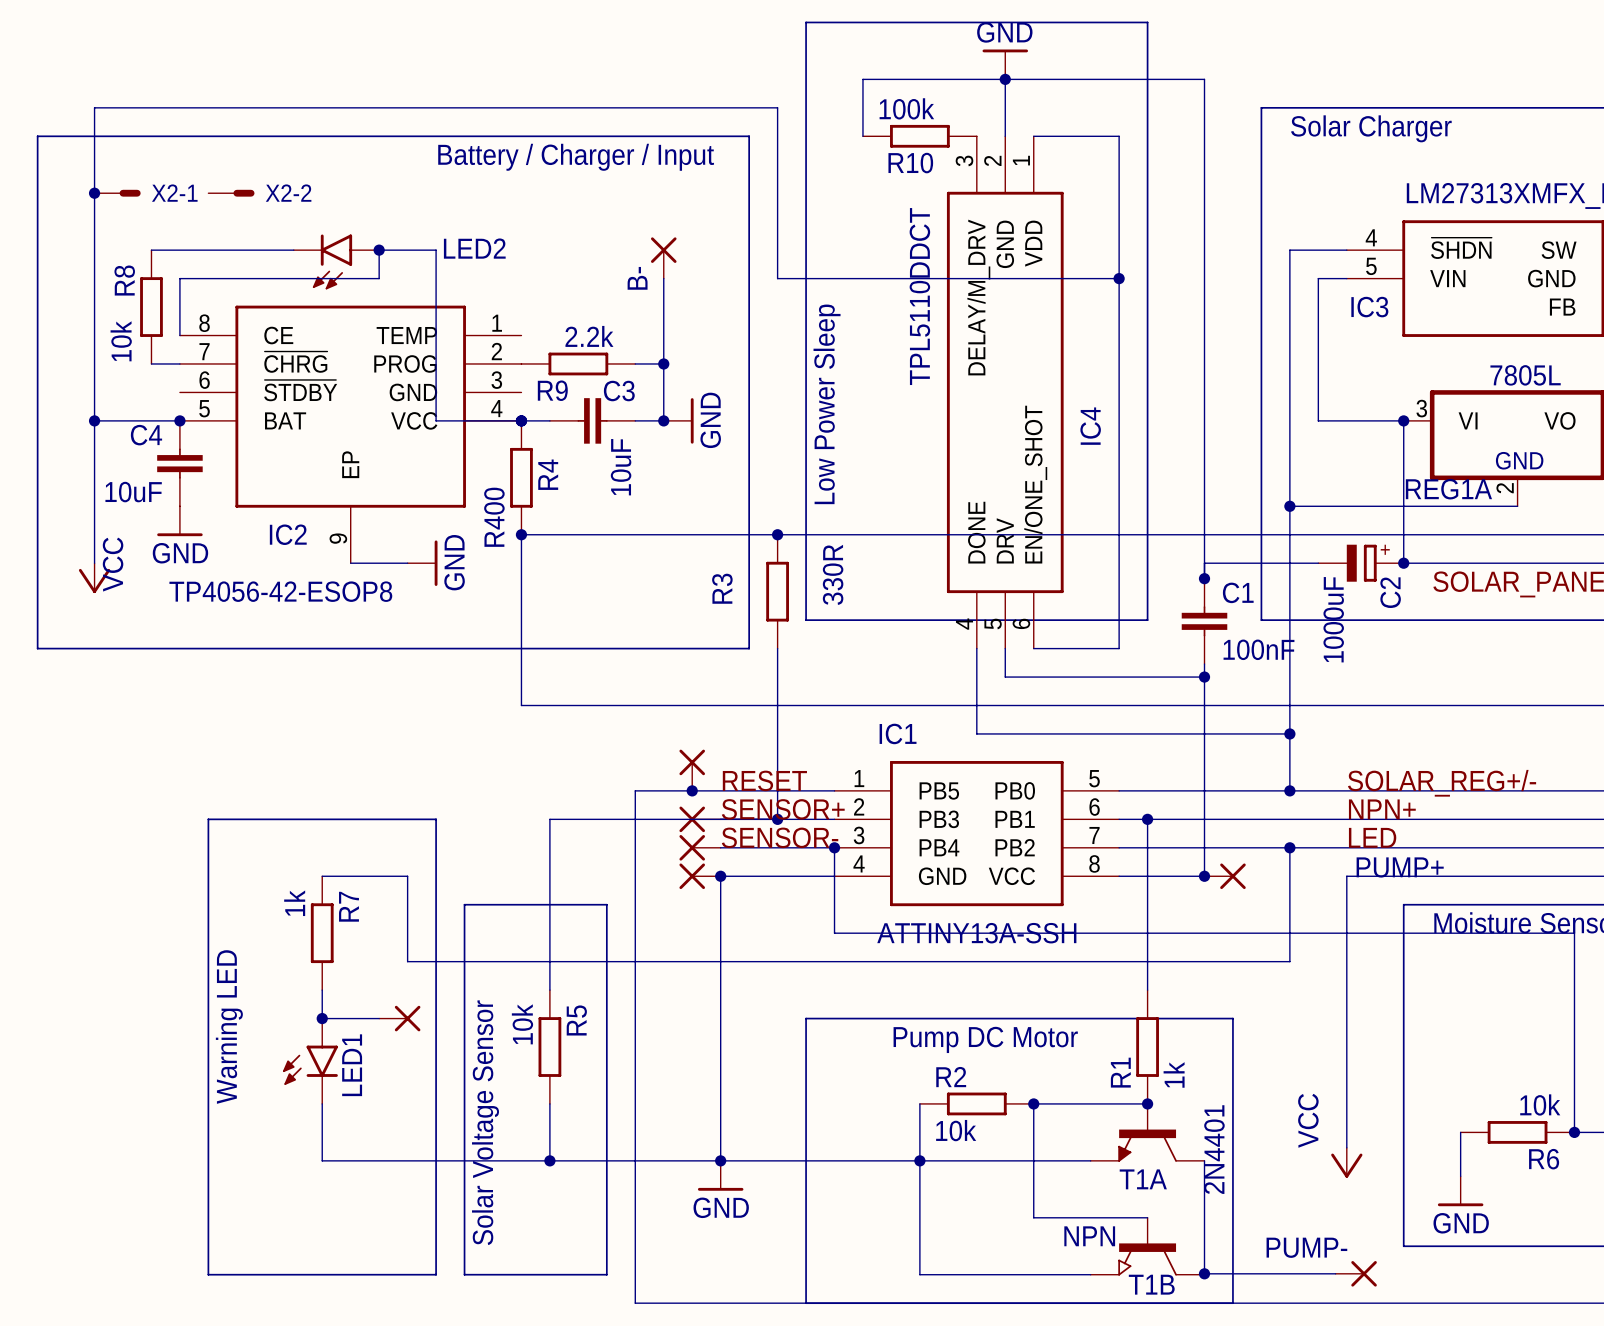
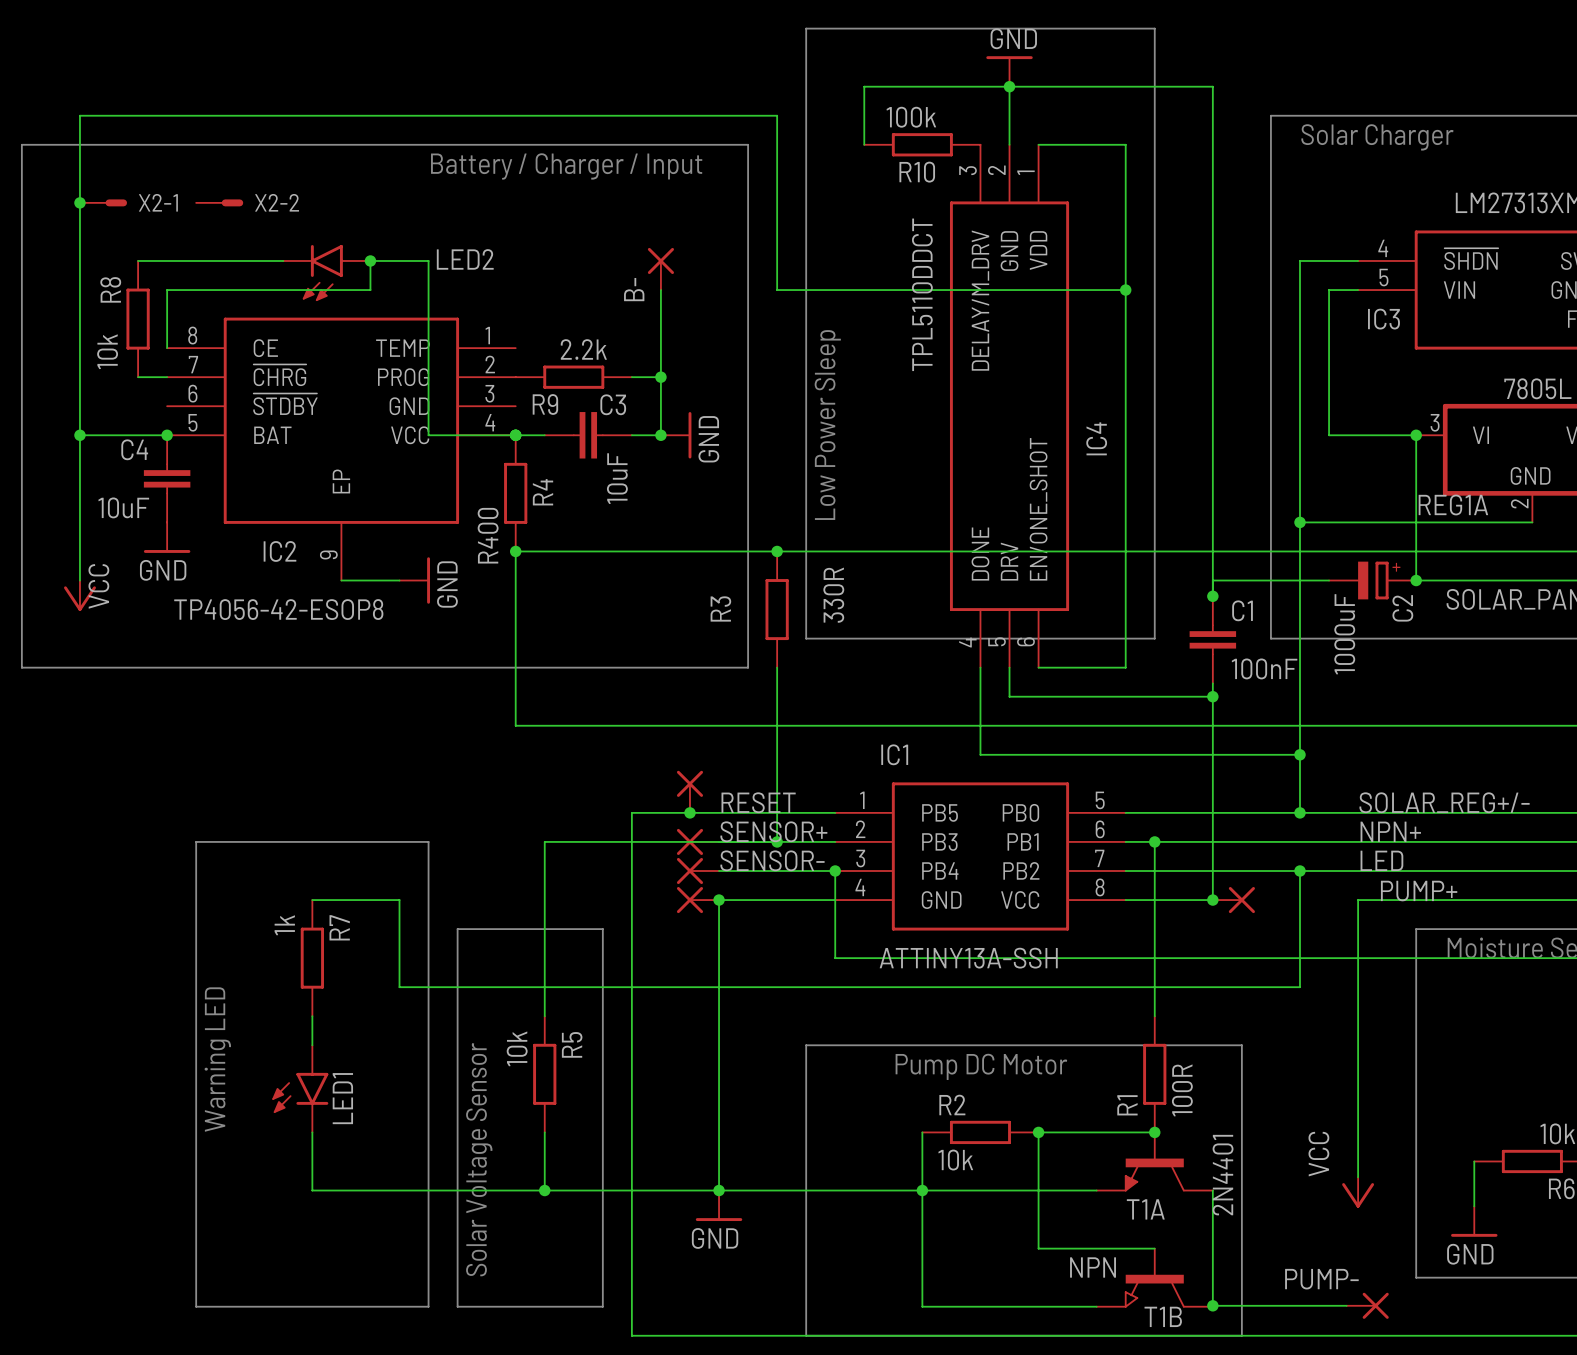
wire: (322, 1018) (379, 1018) -> none
junction: (322, 1018) -> none
part: (399, 1018) -> none
R1 value: 1k (1174, 1074) -> 100R (1182, 1090)

